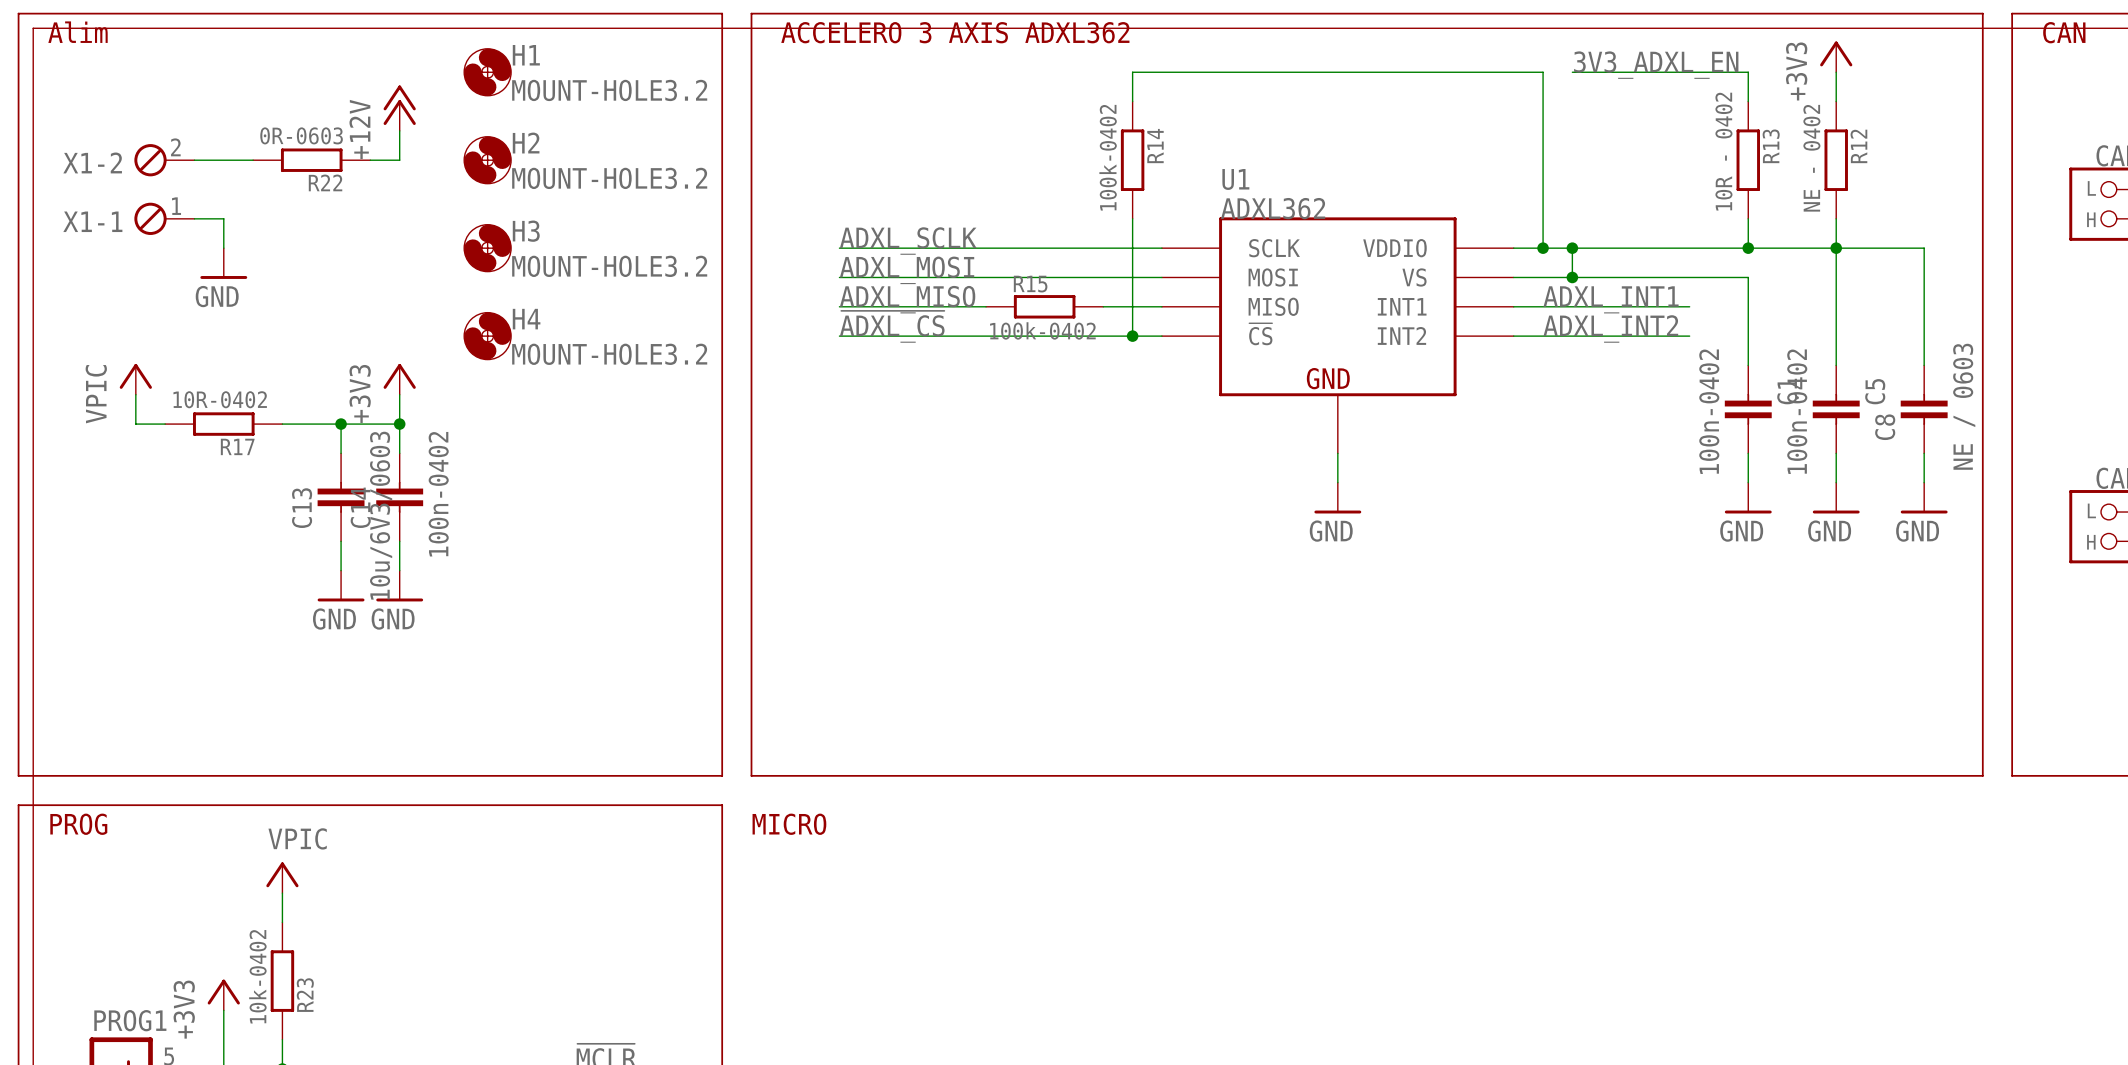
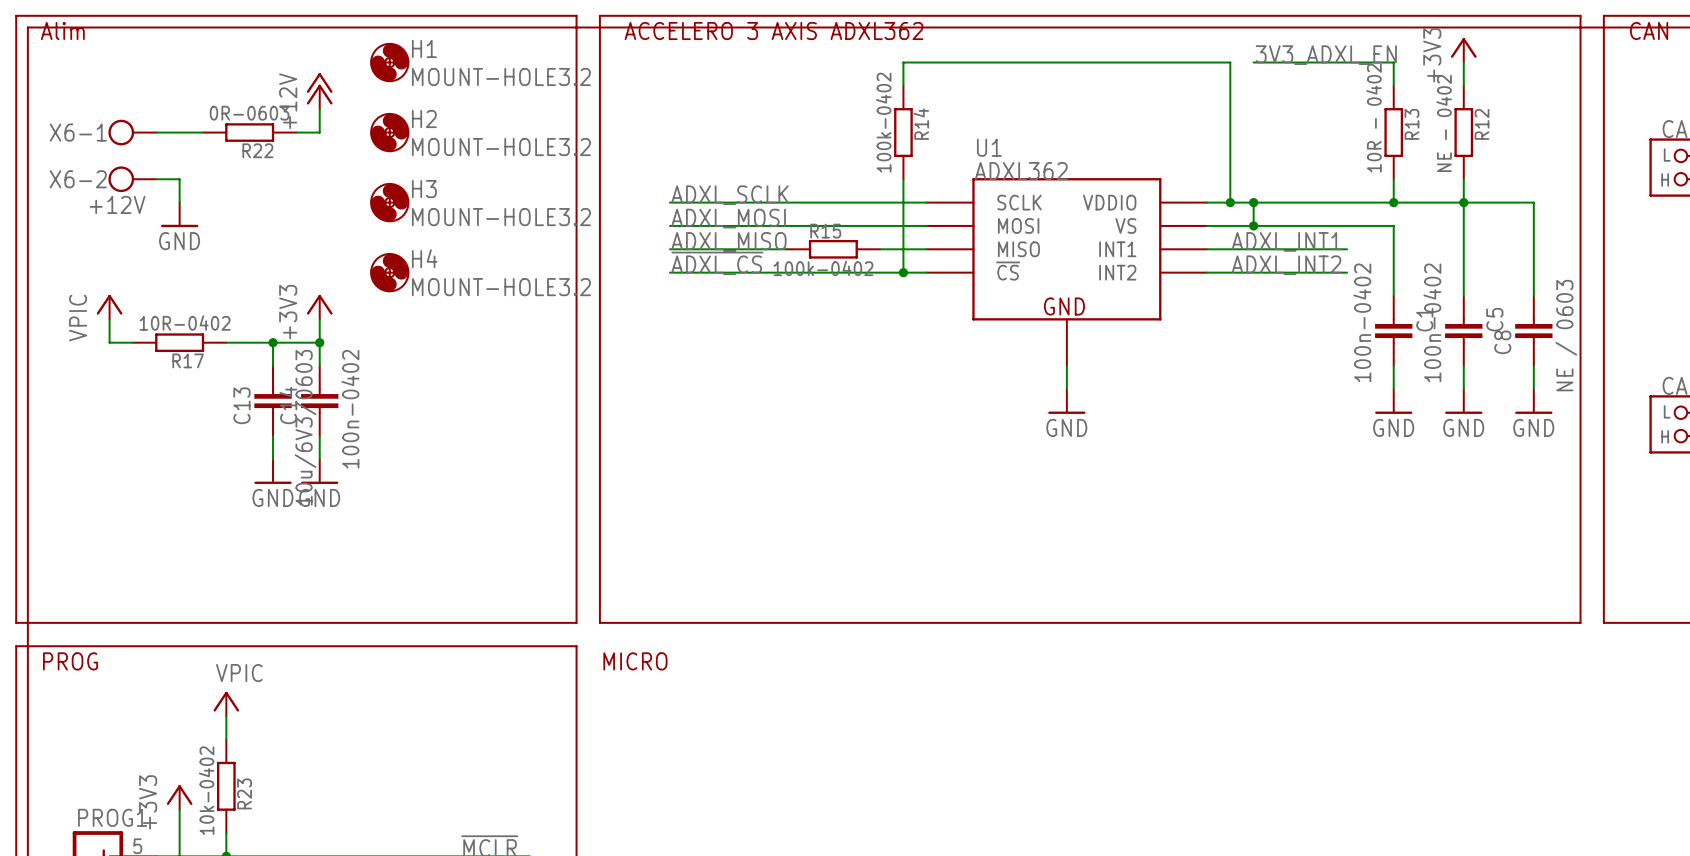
X1-2: (164, 160) -> none
X6-1: none -> (132, 132)
X1-1: (164, 218) -> none
X6-2: none -> +12V (132, 179)

